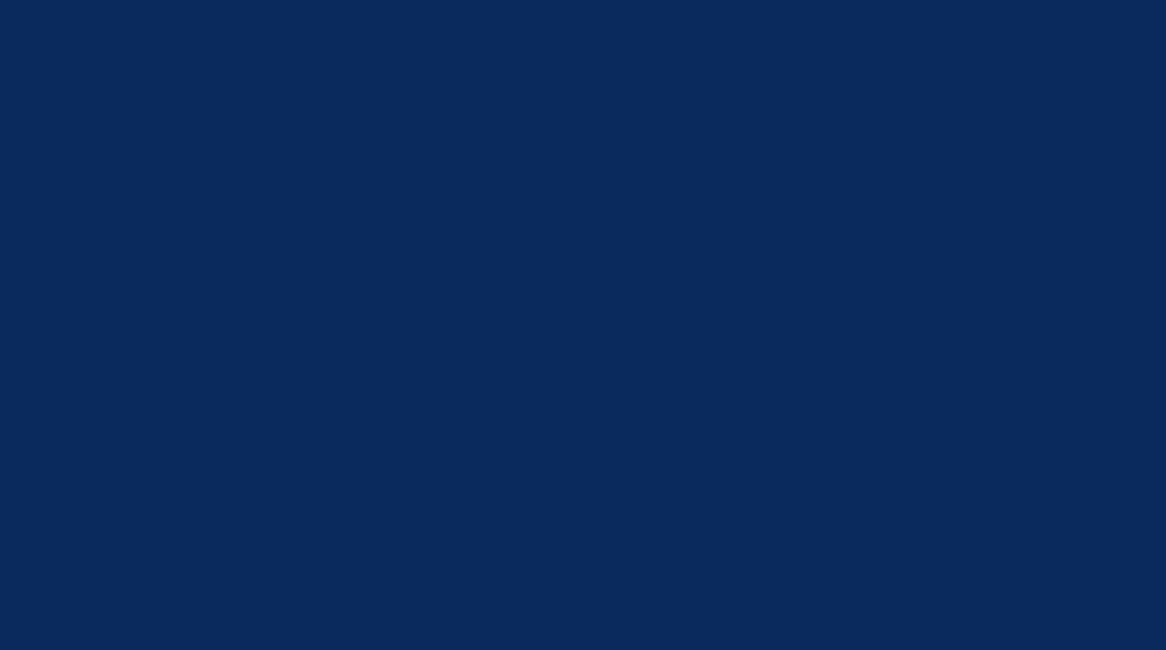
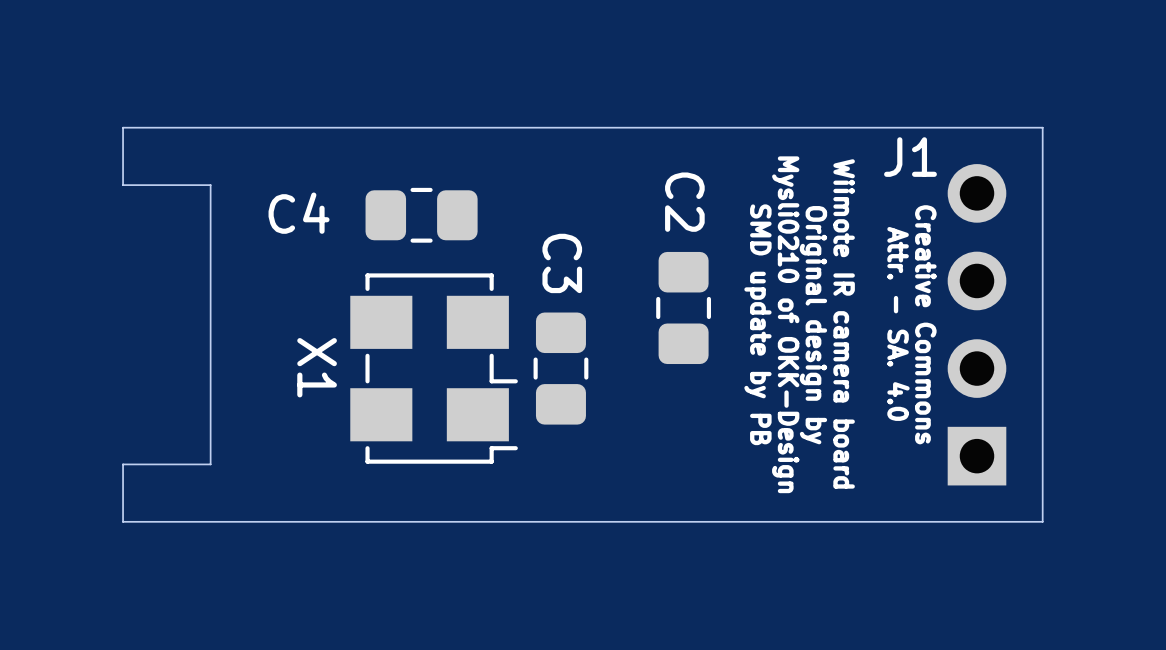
board edge: none -> (1042, 127) (123, 127) (123, 185) (210, 185) (210, 464) (123, 464) (123, 521) (1042, 521) (1042, 127)
C4: none -> (421, 215)
C2: none -> (683, 307)
text: none -> Wiimote IR camera board (844, 323)
text: none -> Attr. - SA. 4.0 (898, 323)
text: none -> SMD update by PB (757, 324)
text: none -> Mysli0210 of OKK-Design (785, 324)
text: none -> Creative Commons (925, 324)
J1: none -> (976, 324)
text: none -> Original design by (813, 325)
X1: none -> (434, 368)
C3: none -> (560, 368)

